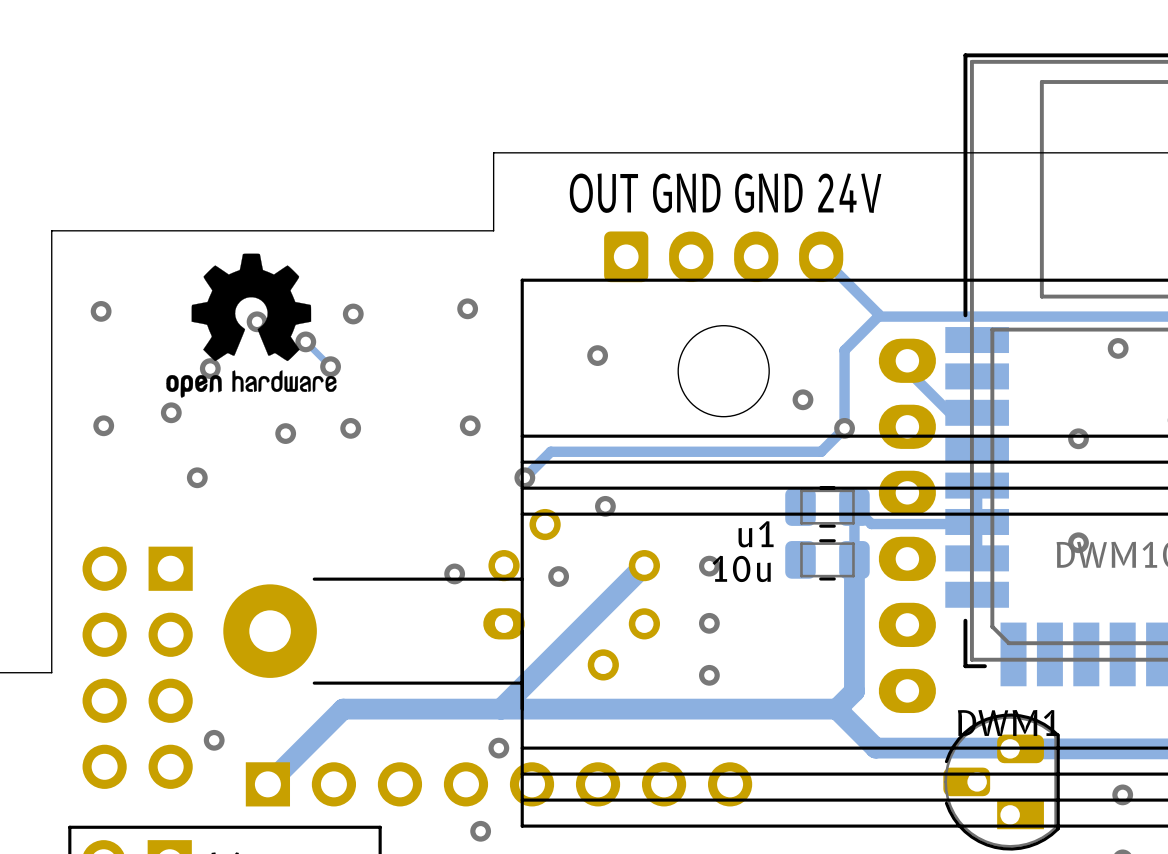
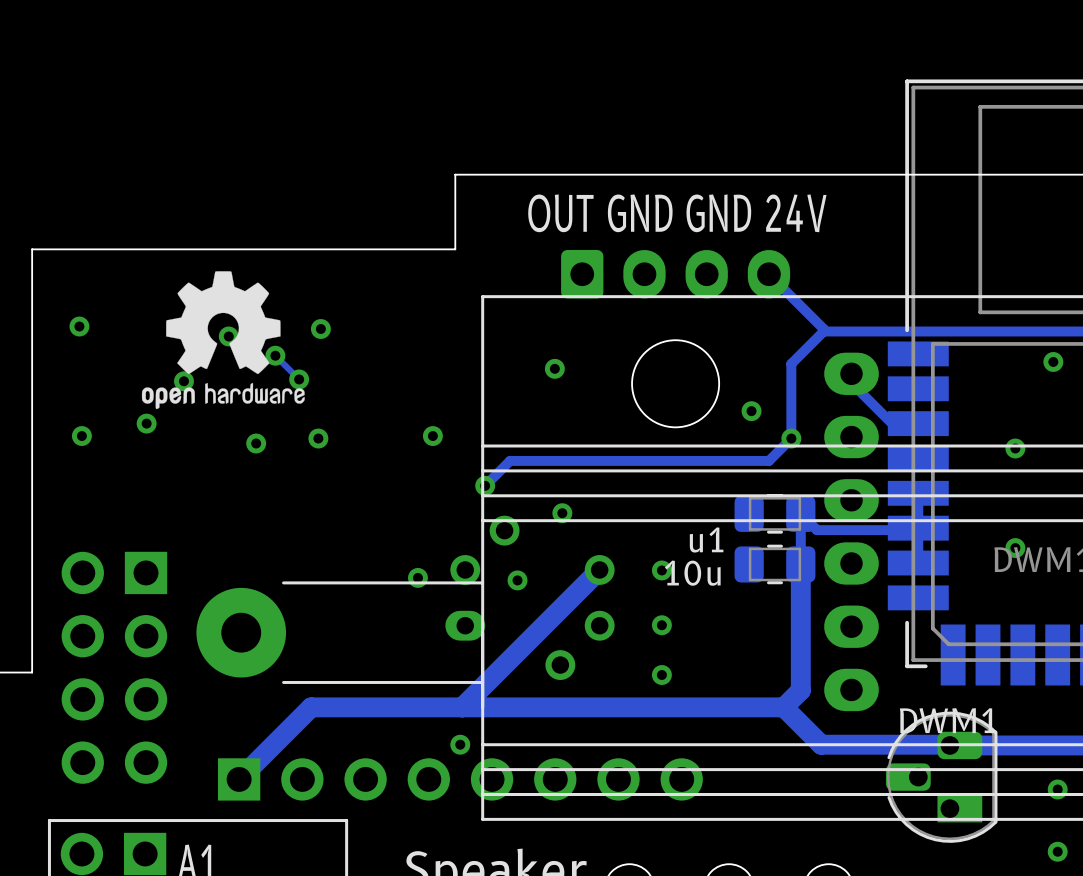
via: (467, 308) -> none
via: (197, 477) -> none
via: (214, 740) -> none
via: (480, 831) -> none

